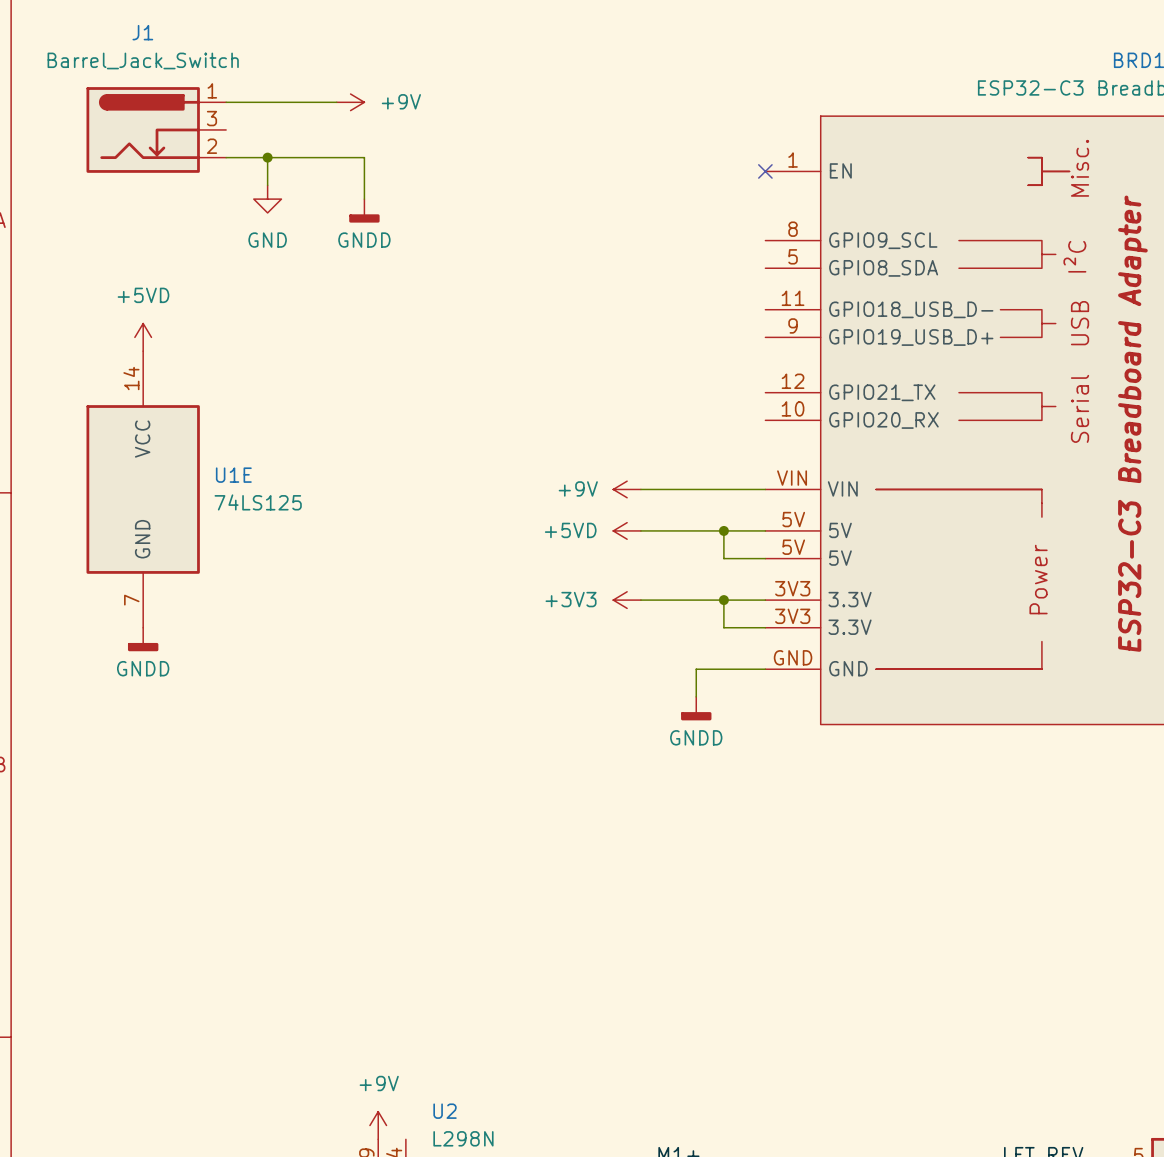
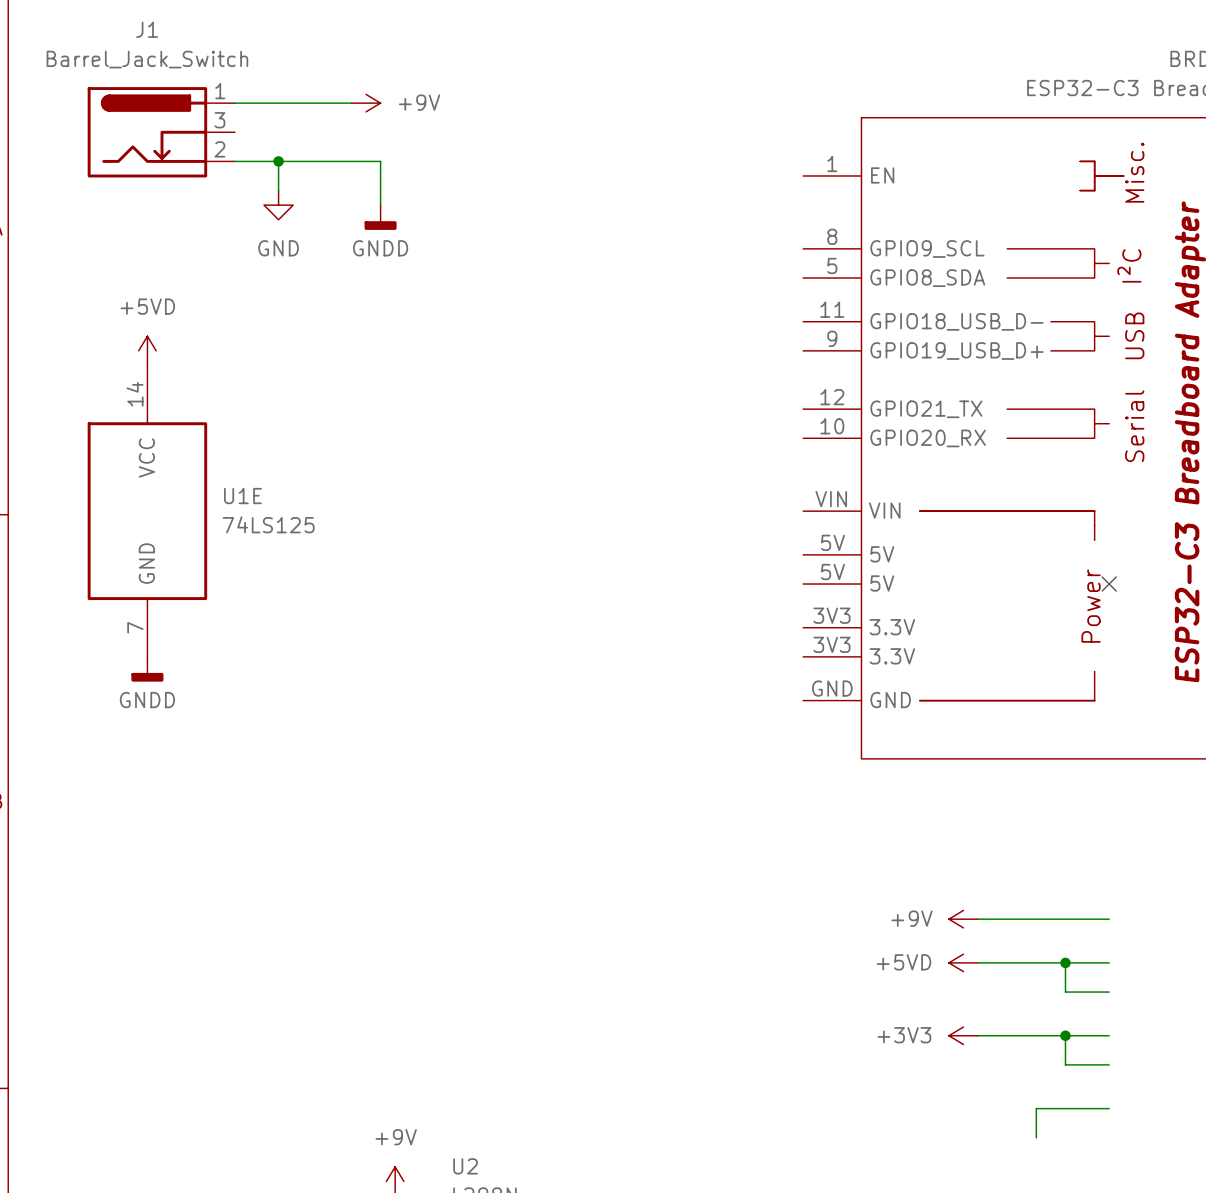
no-connect mark: (765, 171) -> none
power symbol: +9V (627, 489) -> none
wire: (640, 489) (765, 489) -> none
power symbol: +5VD (627, 530) -> none
wire: (640, 530) (765, 530) -> none
wire: (723, 530) (723, 558) (765, 558) -> none
junction: (723, 530) -> none
no-connect mark: none -> (1109, 584)
power symbol: +3V3 (627, 600) -> none
wire: (640, 600) (765, 600) -> none
wire: (723, 600) (723, 627) (765, 627) -> none
junction: (723, 600) -> none
wire: (765, 669) (696, 669) (696, 696) -> none
power symbol: GNDD (696, 708) -> none
power symbol: none -> +9V (963, 919)
wire: none -> (978, 919) (1109, 919)
power symbol: none -> +5VD (963, 962)
wire: none -> (978, 962) (1109, 962)
wire: none -> (1065, 962) (1065, 992) (1109, 992)
junction: none -> (1065, 962)
power symbol: none -> +3V3 (963, 1035)
wire: none -> (978, 1035) (1109, 1035)
wire: none -> (1065, 1035) (1065, 1064) (1109, 1064)
junction: none -> (1065, 1035)
wire: none -> (1109, 1108) (1036, 1108) (1036, 1137)

